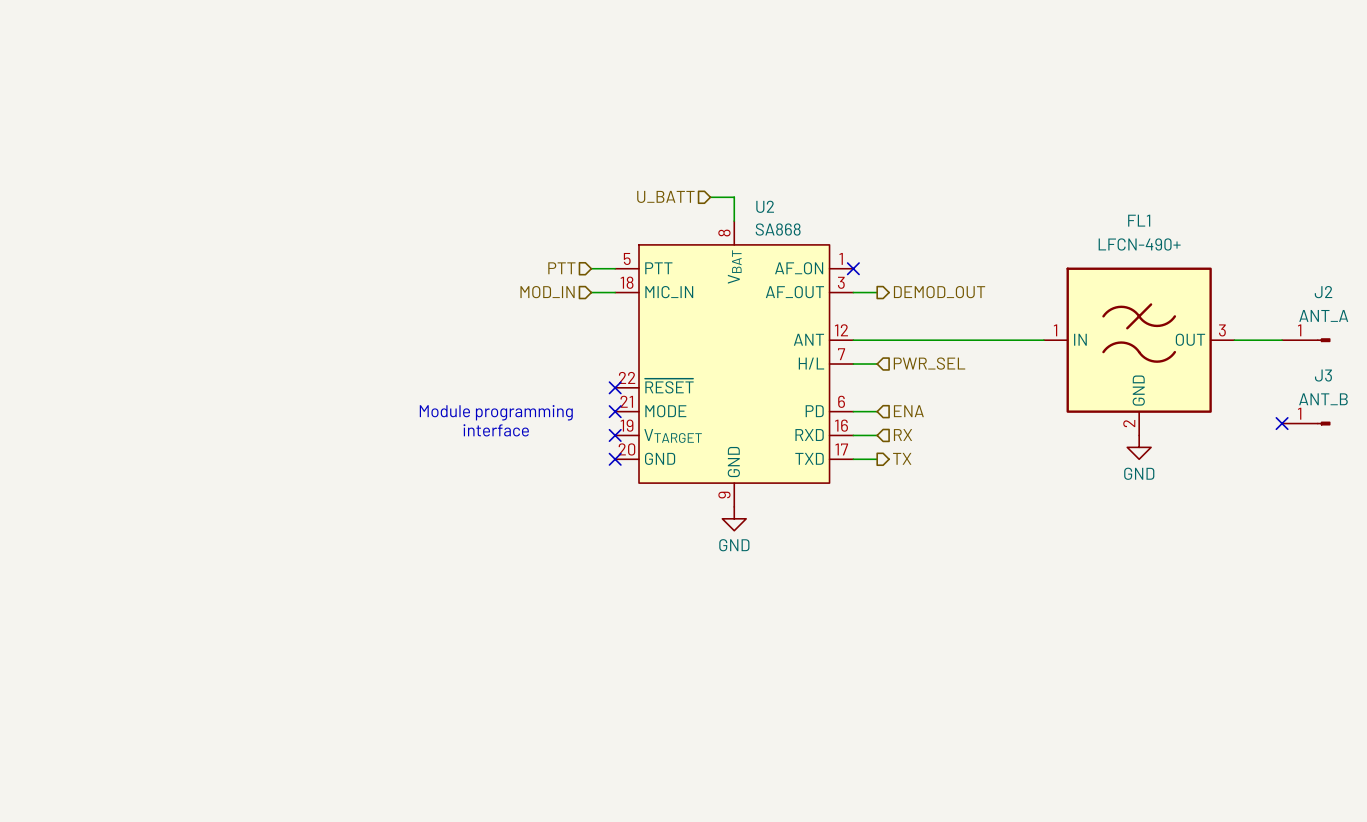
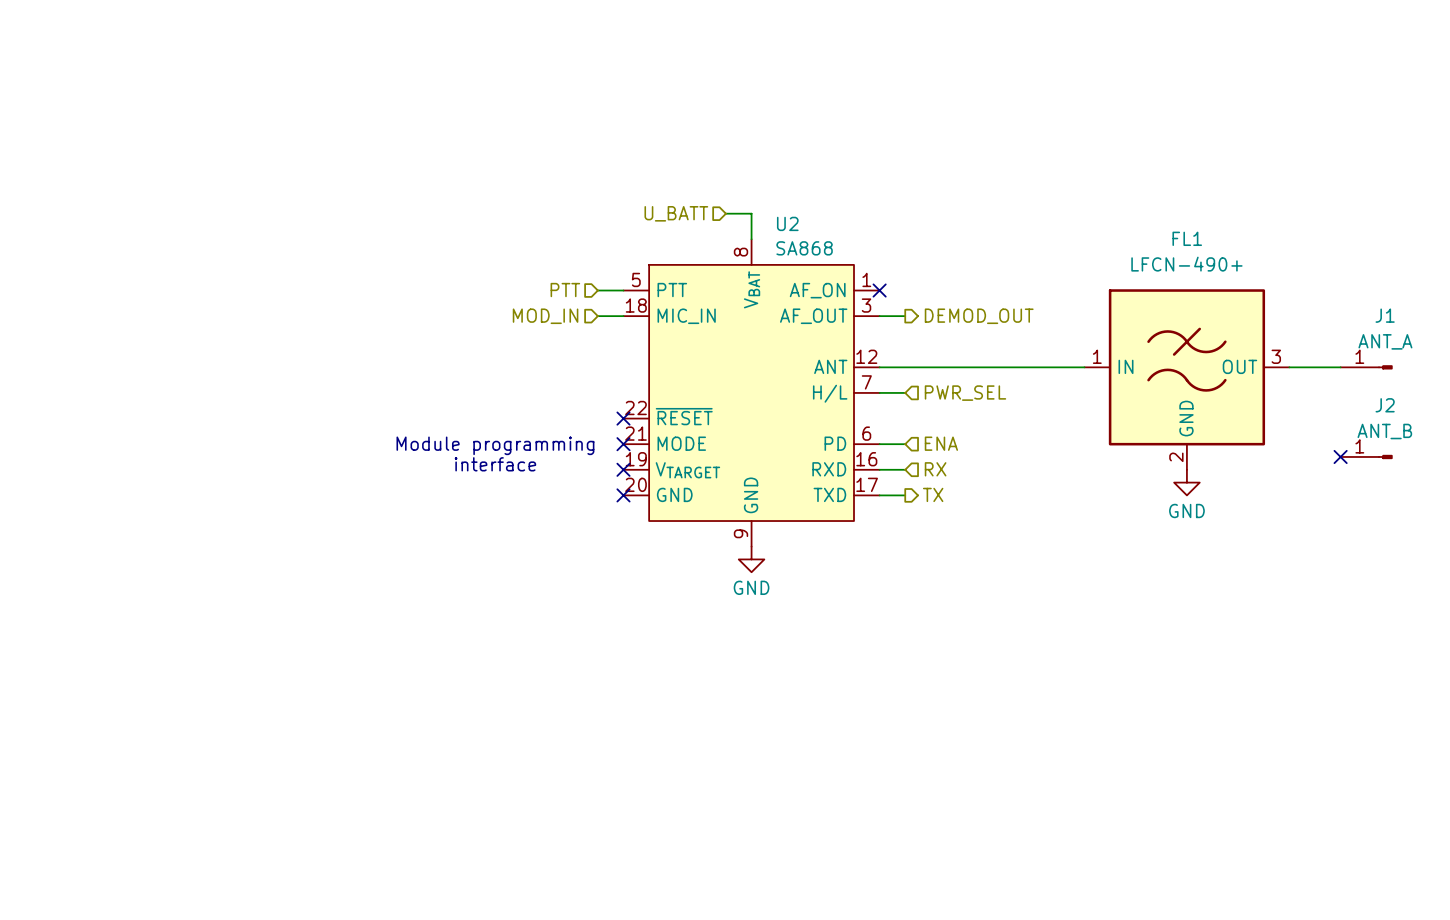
J2 name: J2 (1323, 292) -> J1 (1385, 315)
J3 name: J3 (1323, 375) -> J2 (1385, 405)

